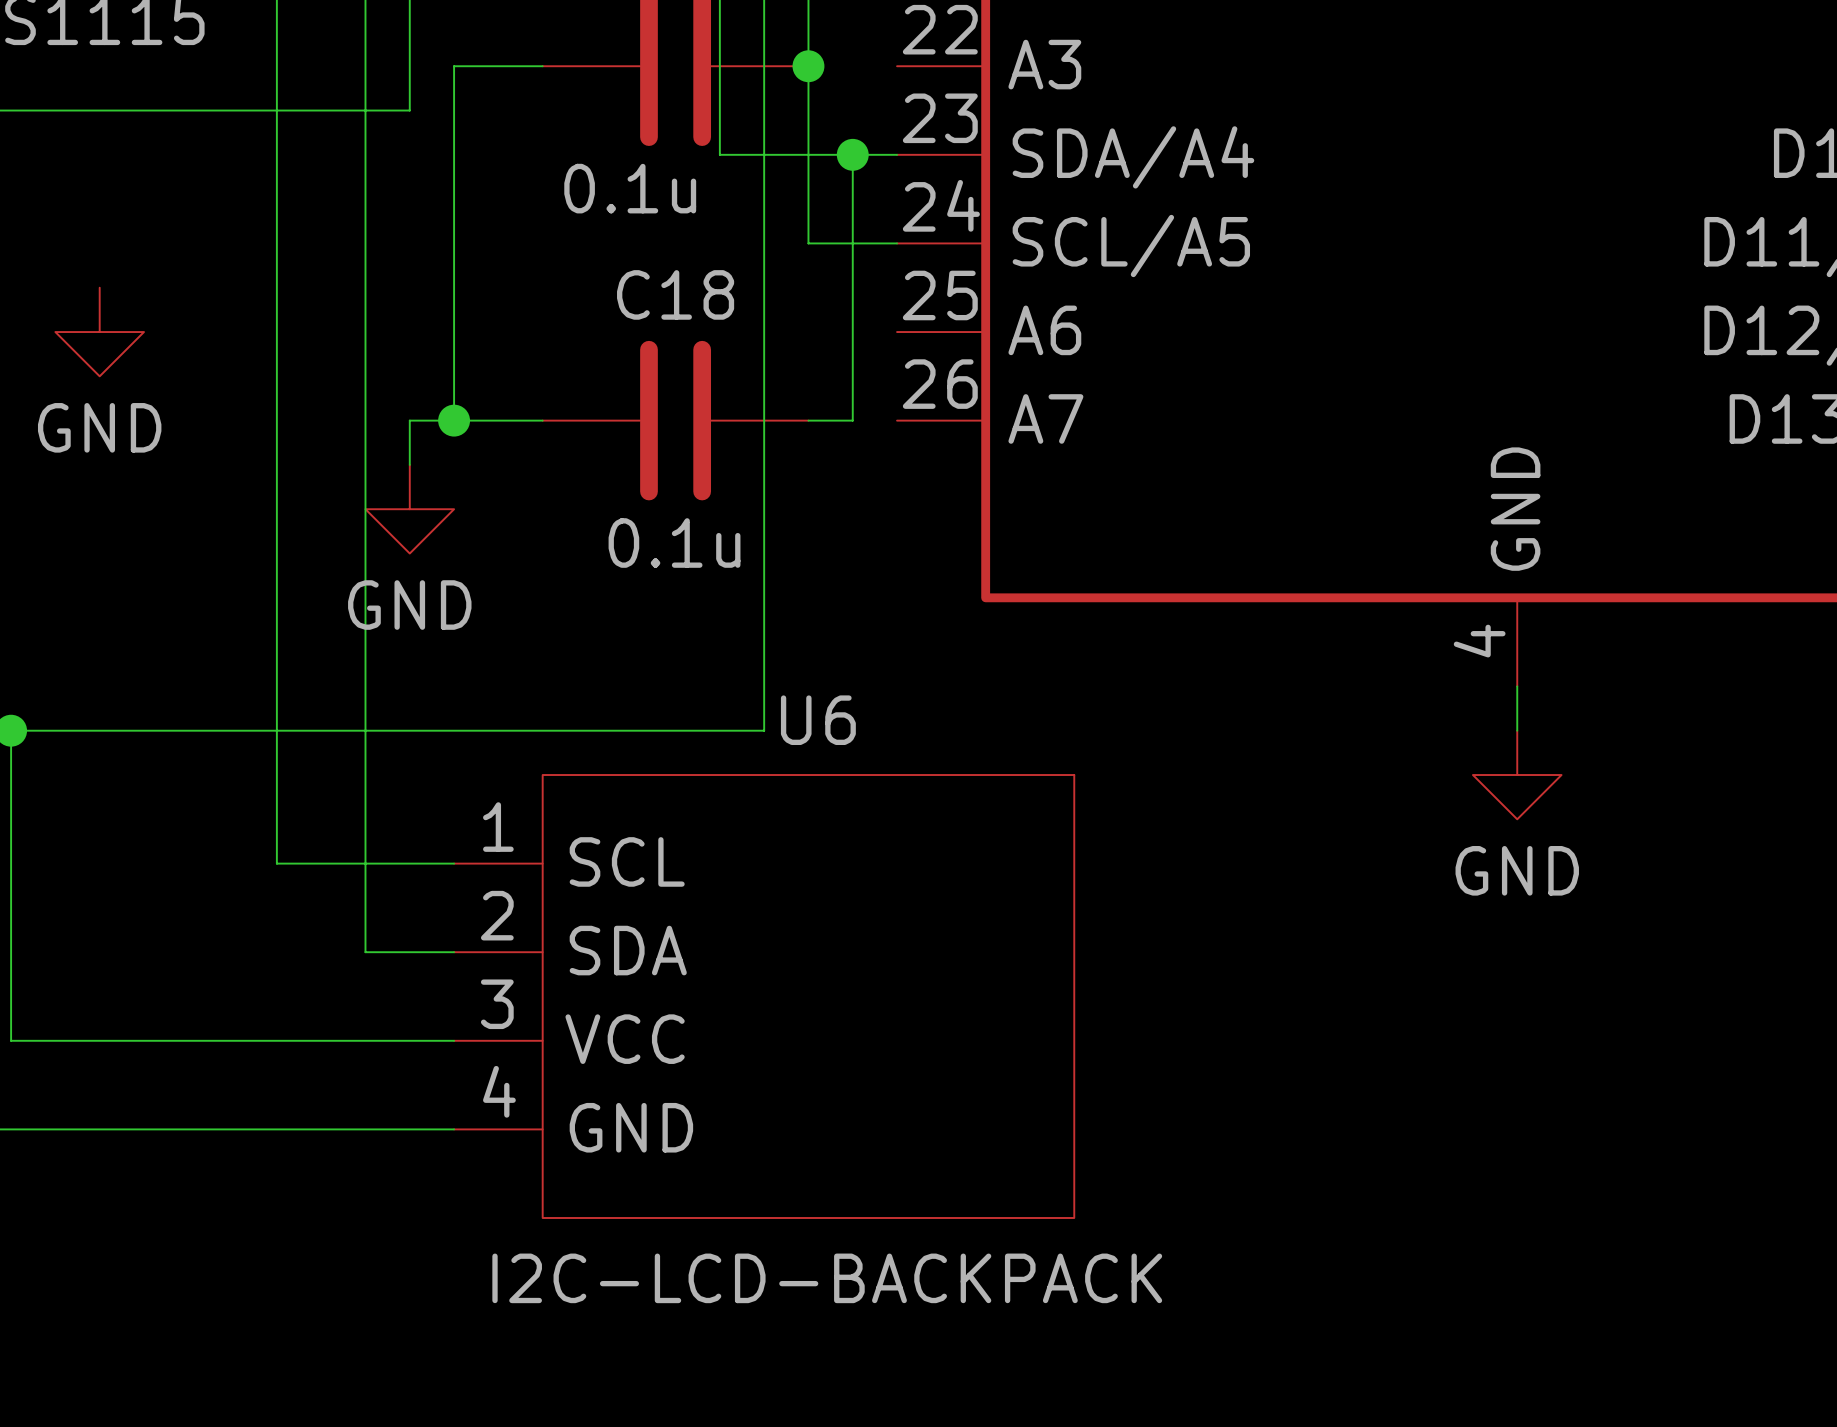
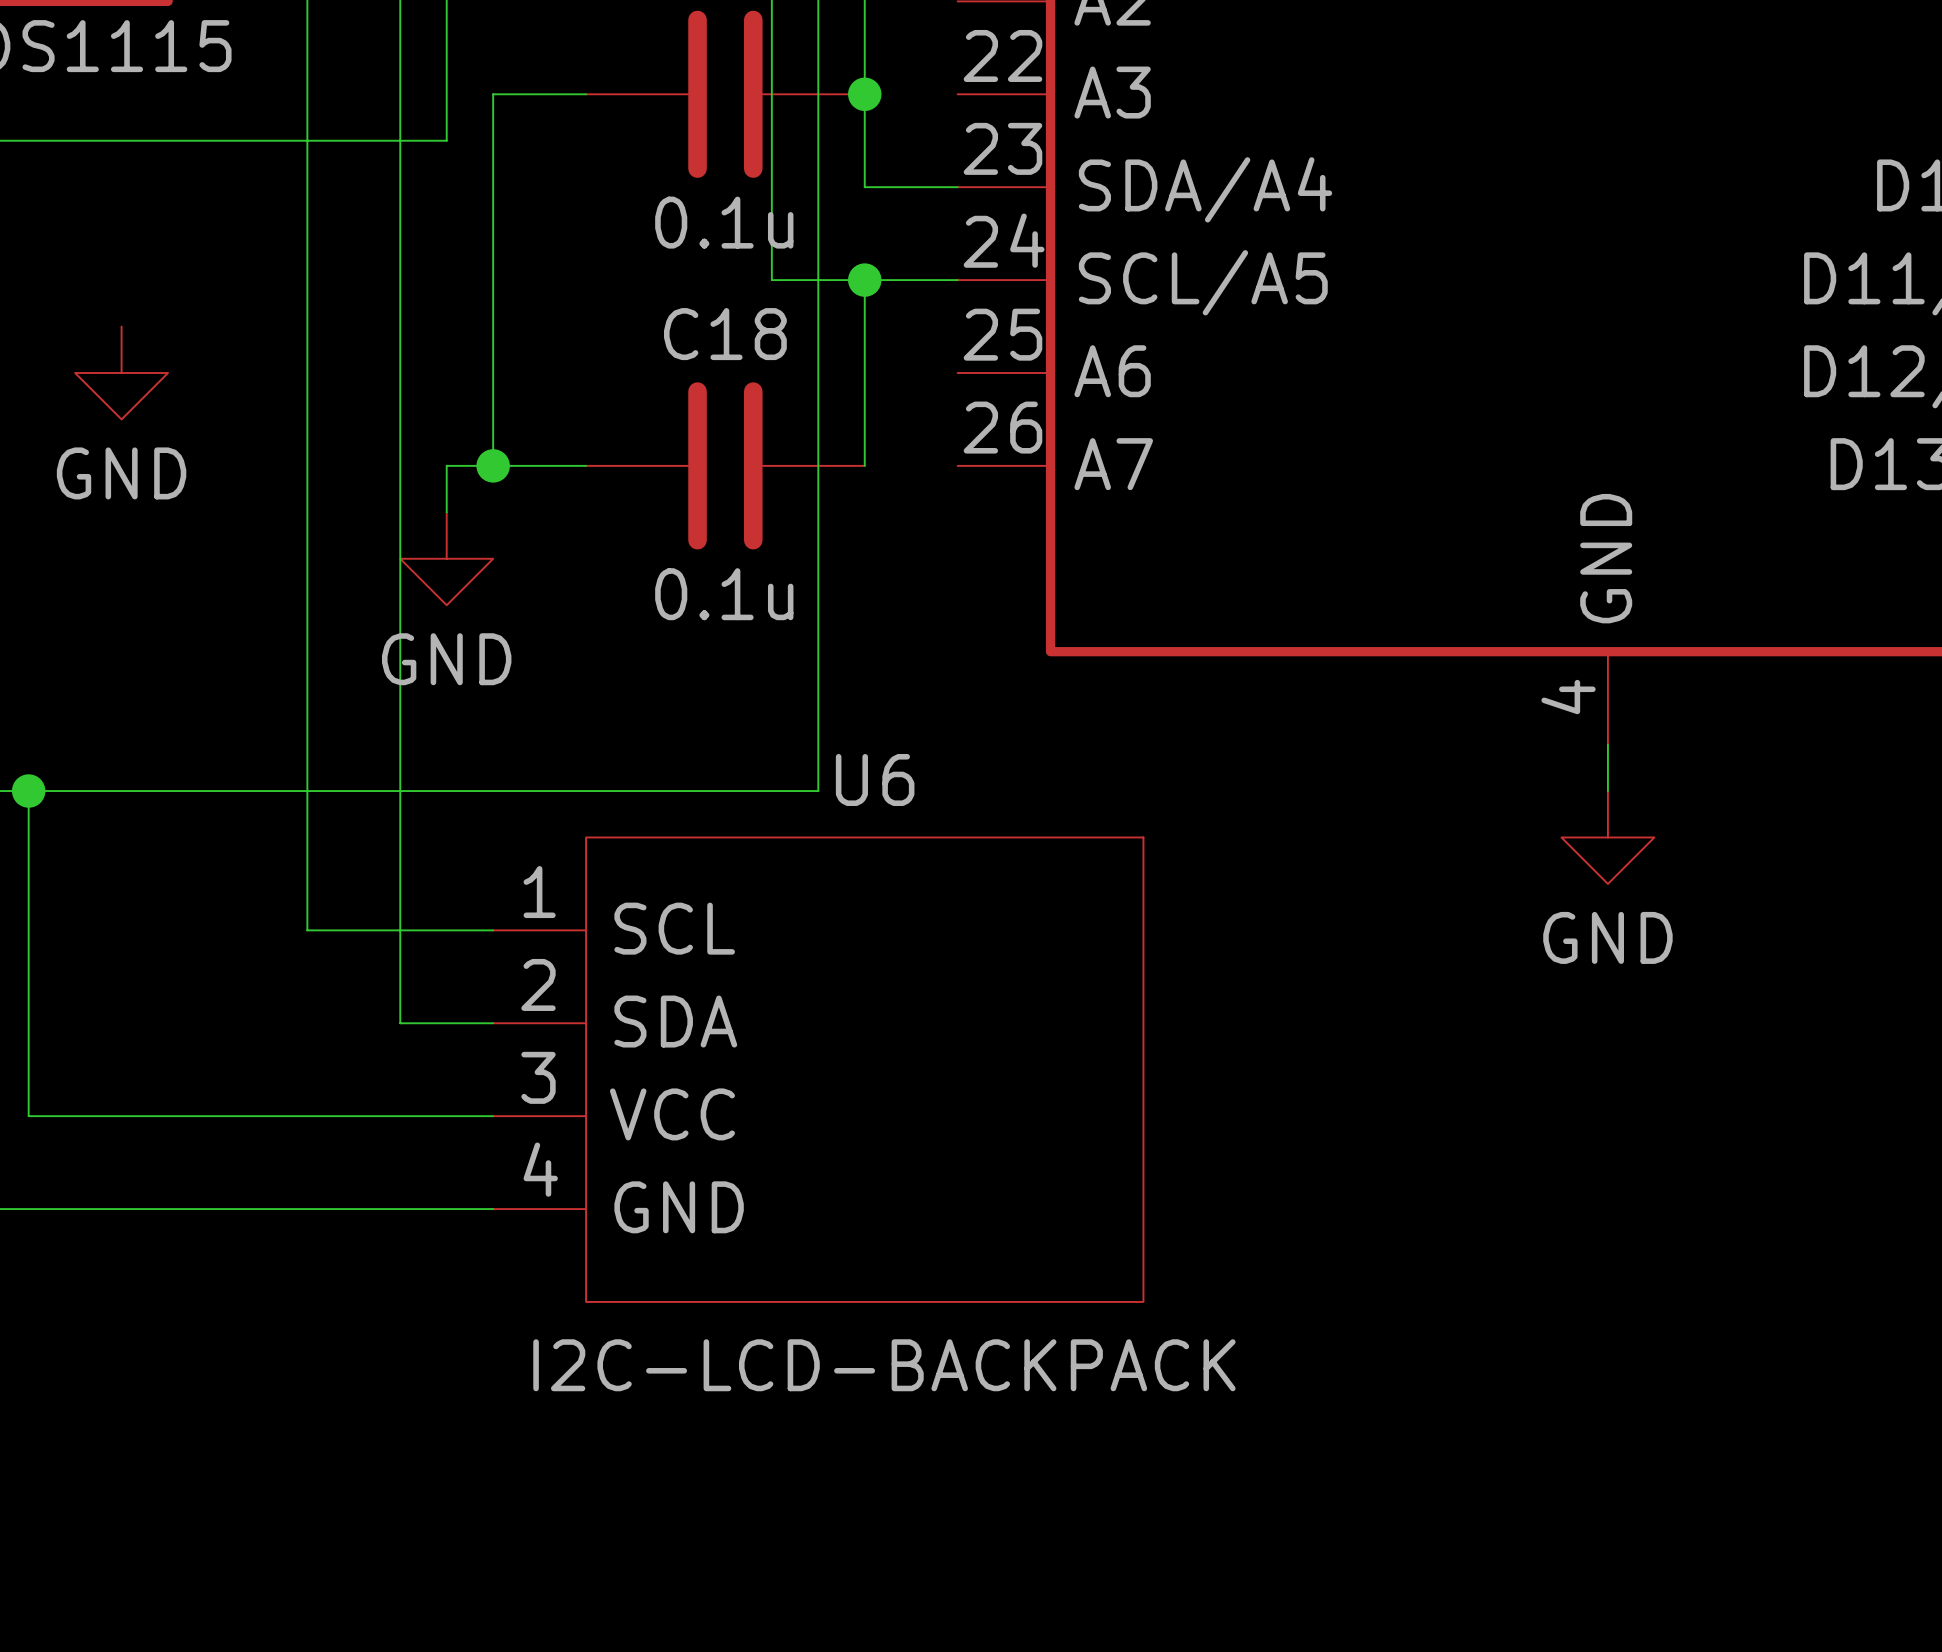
wire: (719, 154) (808, 154) (808, 243) -> none
wire: (852, 154) (852, 420) (808, 420) -> (771, 187) (771, 280) (864, 280) (864, 465)
junction position: (852, 154) -> (864, 280)
part value position: 0.1u (630, 188) -> 0.1u (724, 222)

